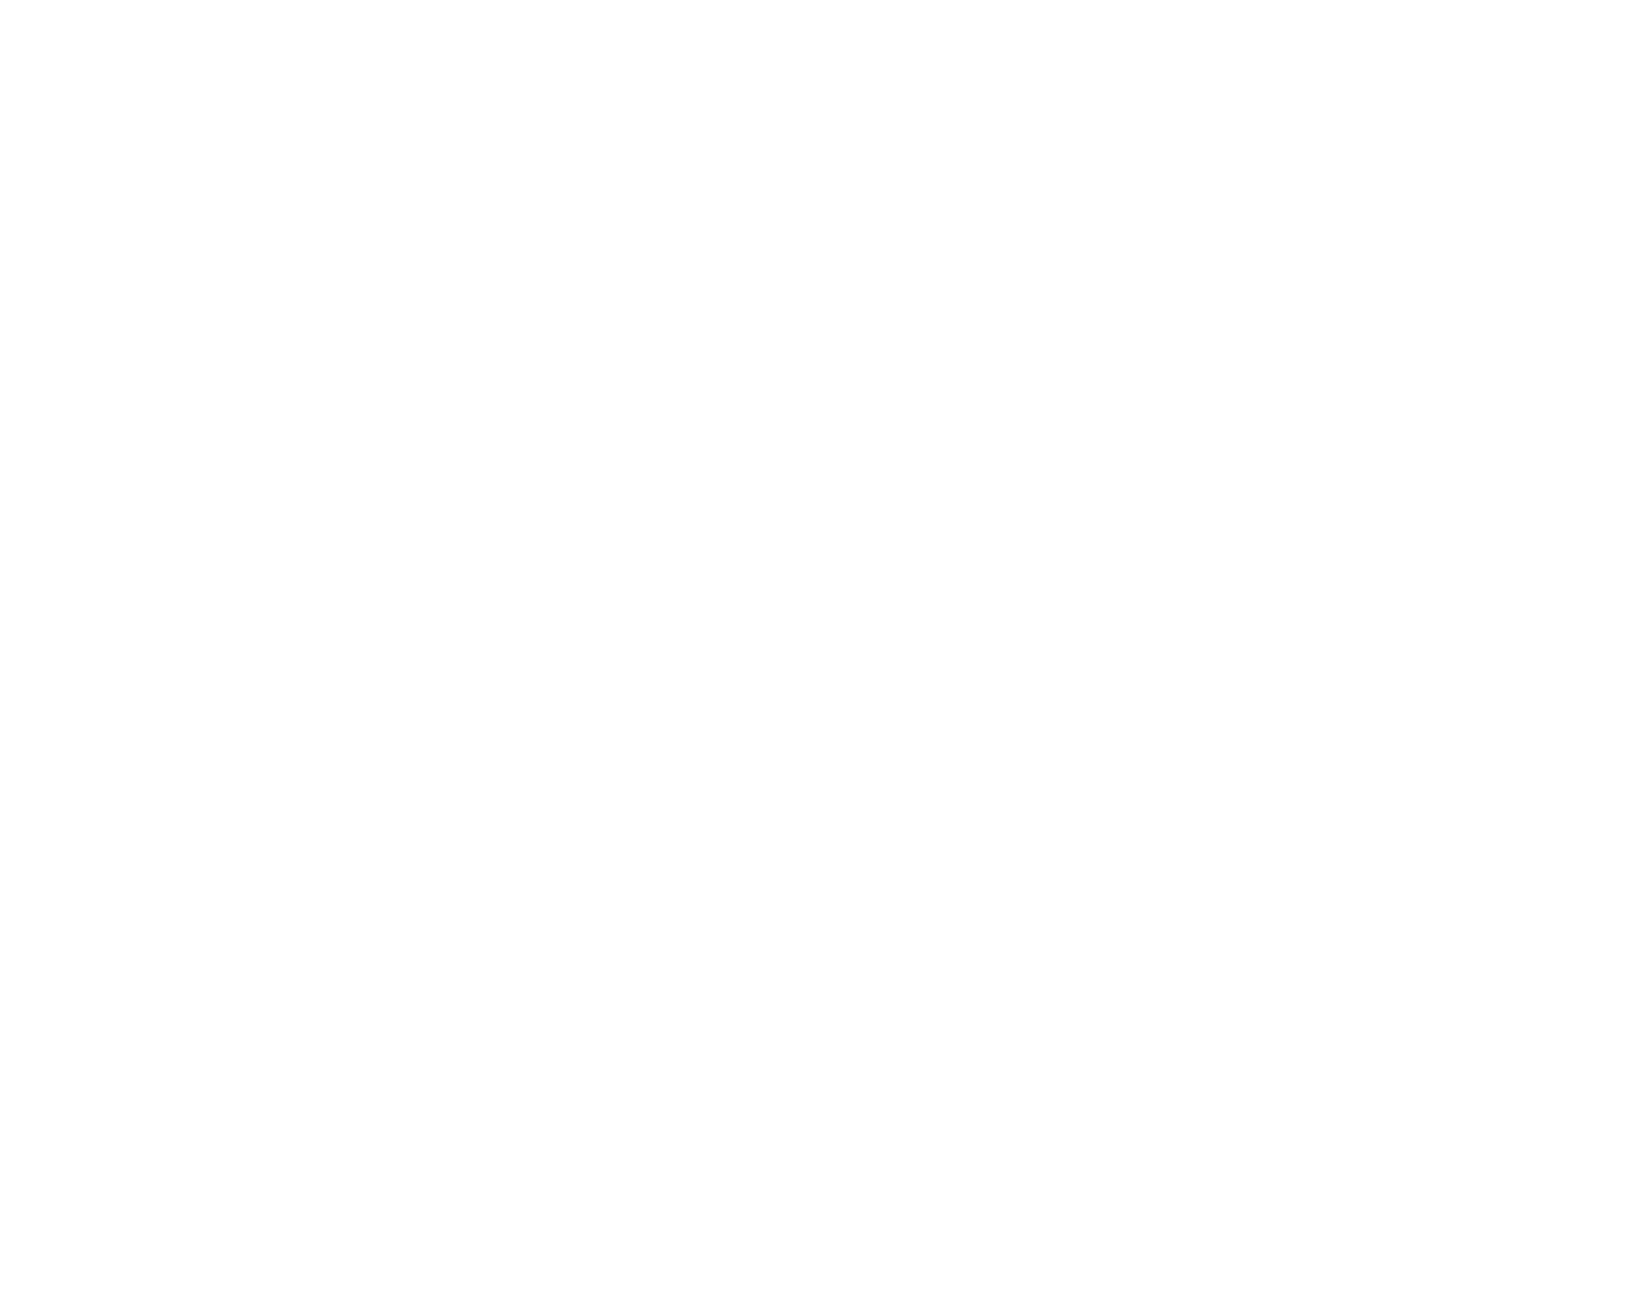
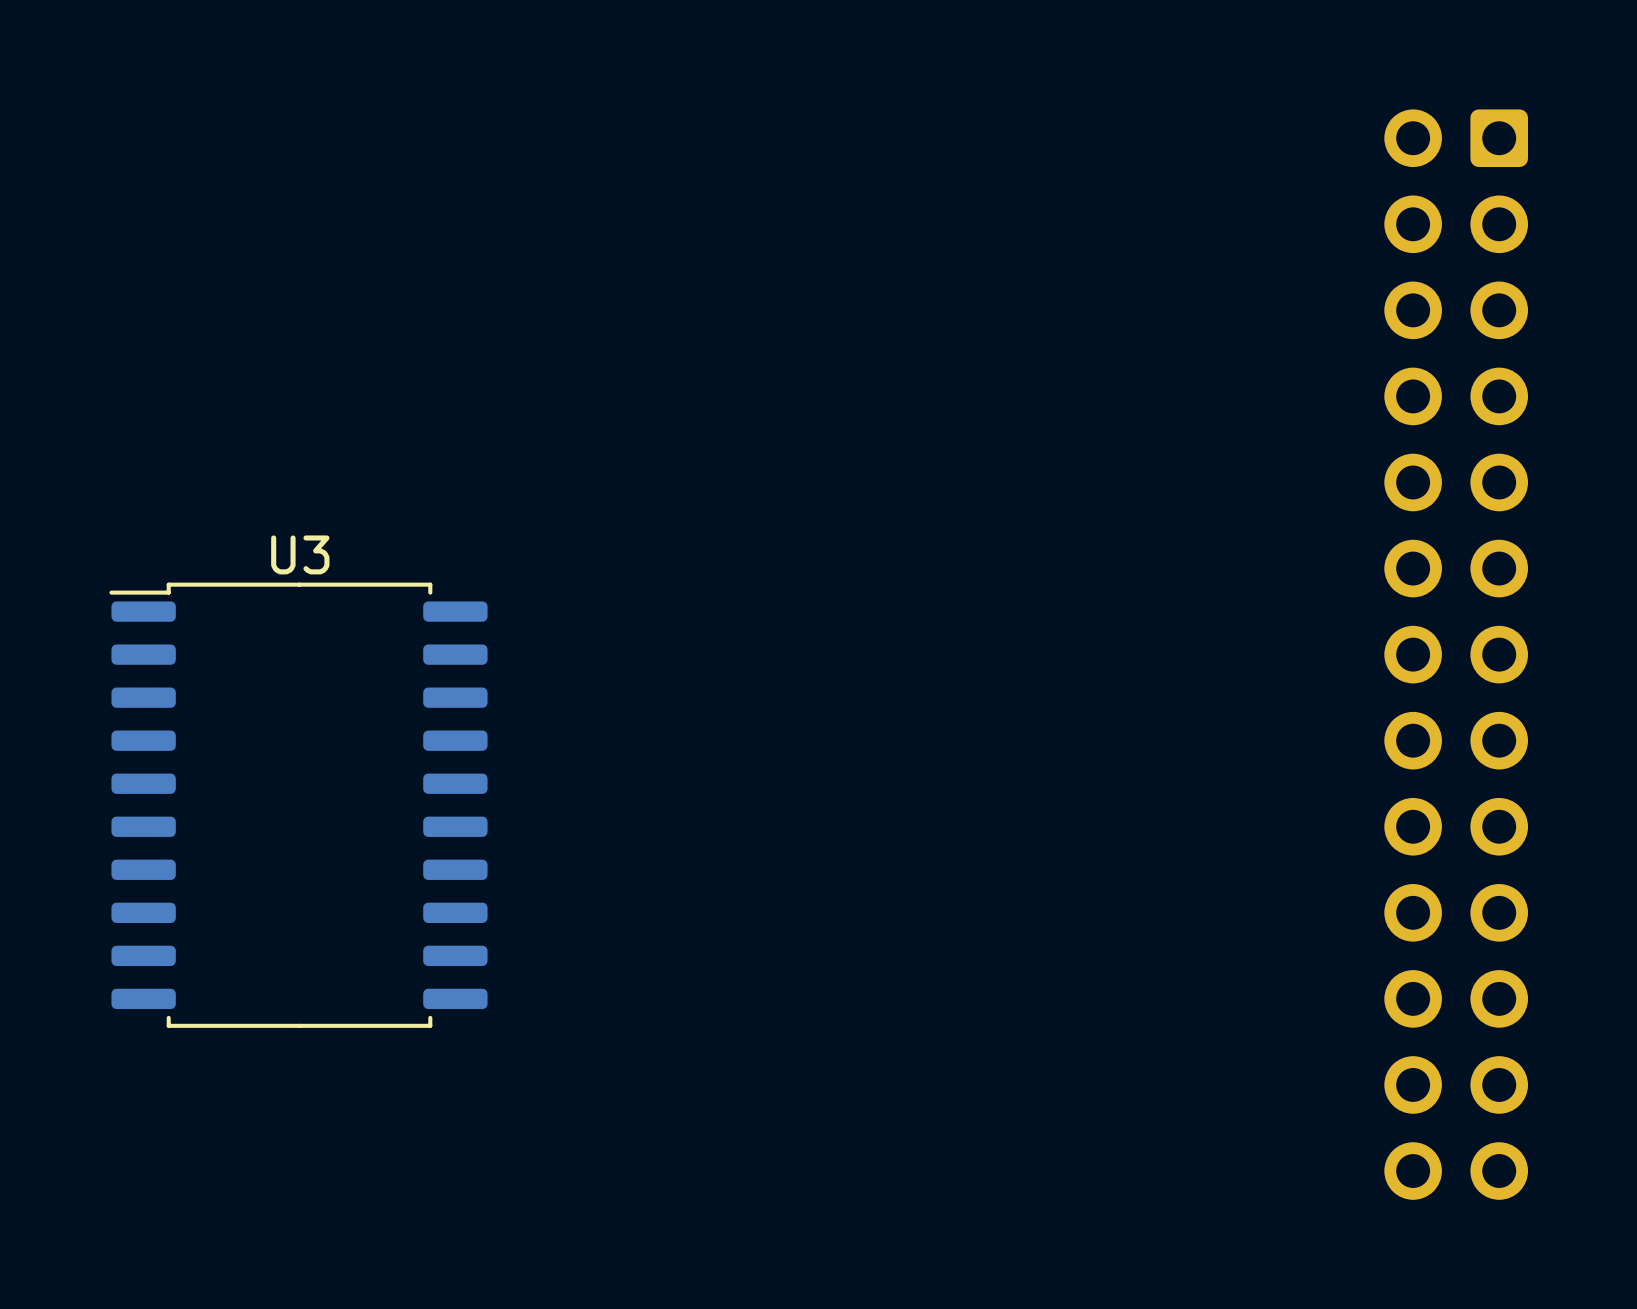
part: none -> (1456, 654)
U3: none -> (298, 805)

